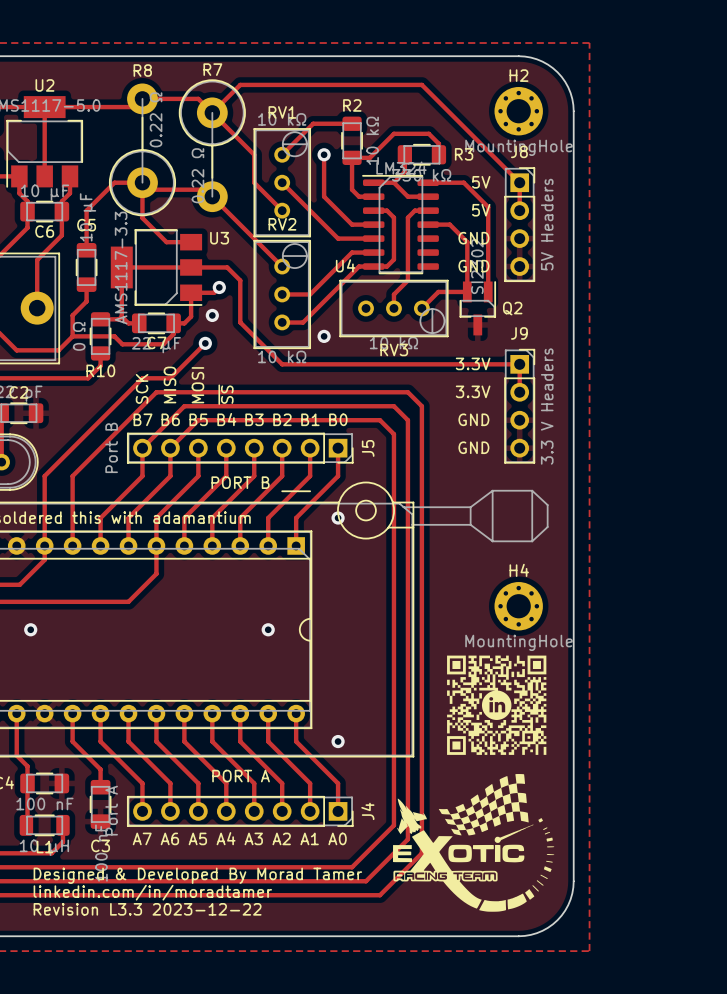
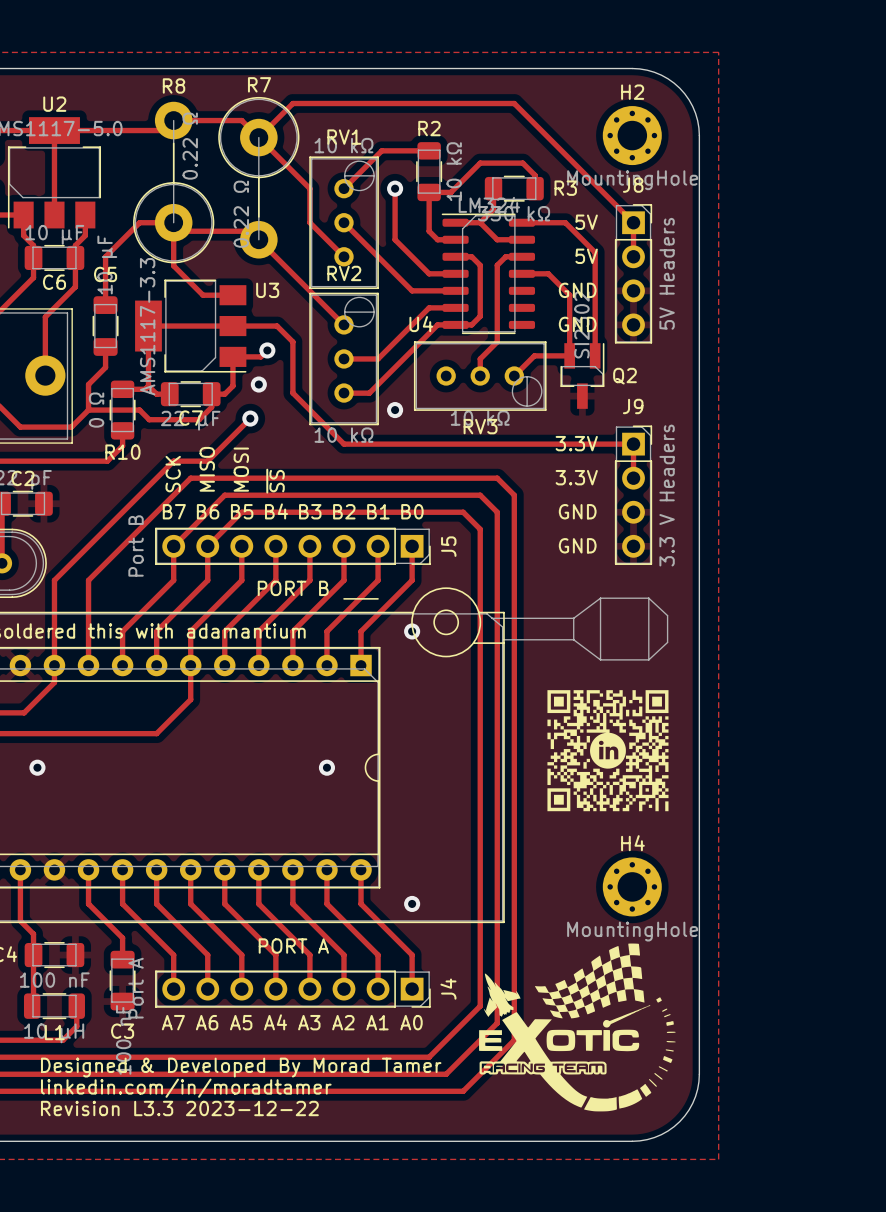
H4 position: (518, 606) -> (632, 886)
drawing position: (496, 705) -> (607, 750)

